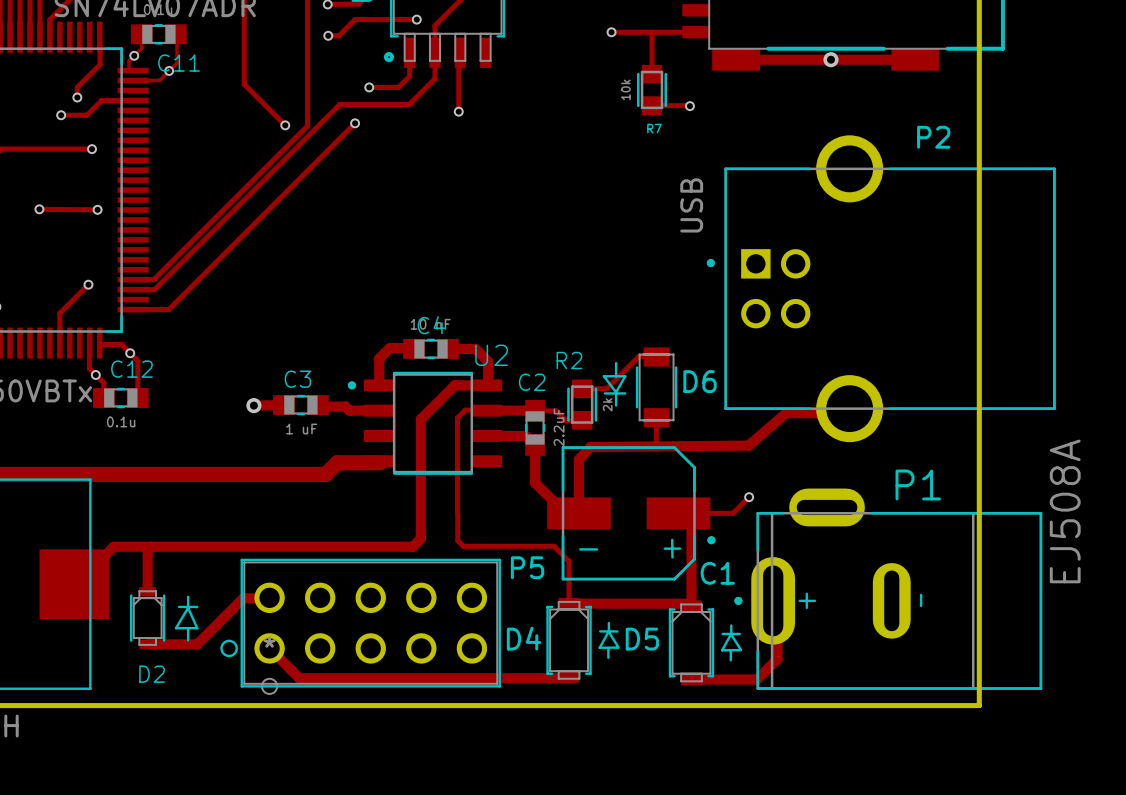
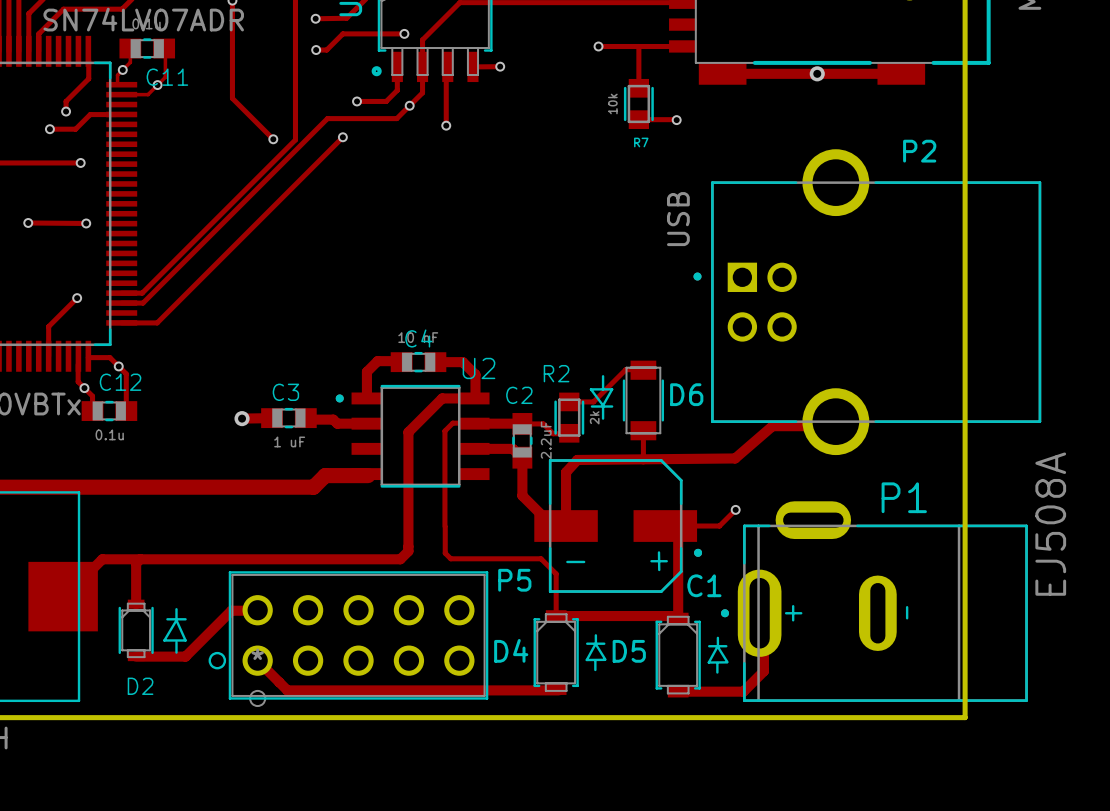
track: none -> (500, 66) (472, 66)
via: none -> (500, 66)
via: none -> (409, 105)

